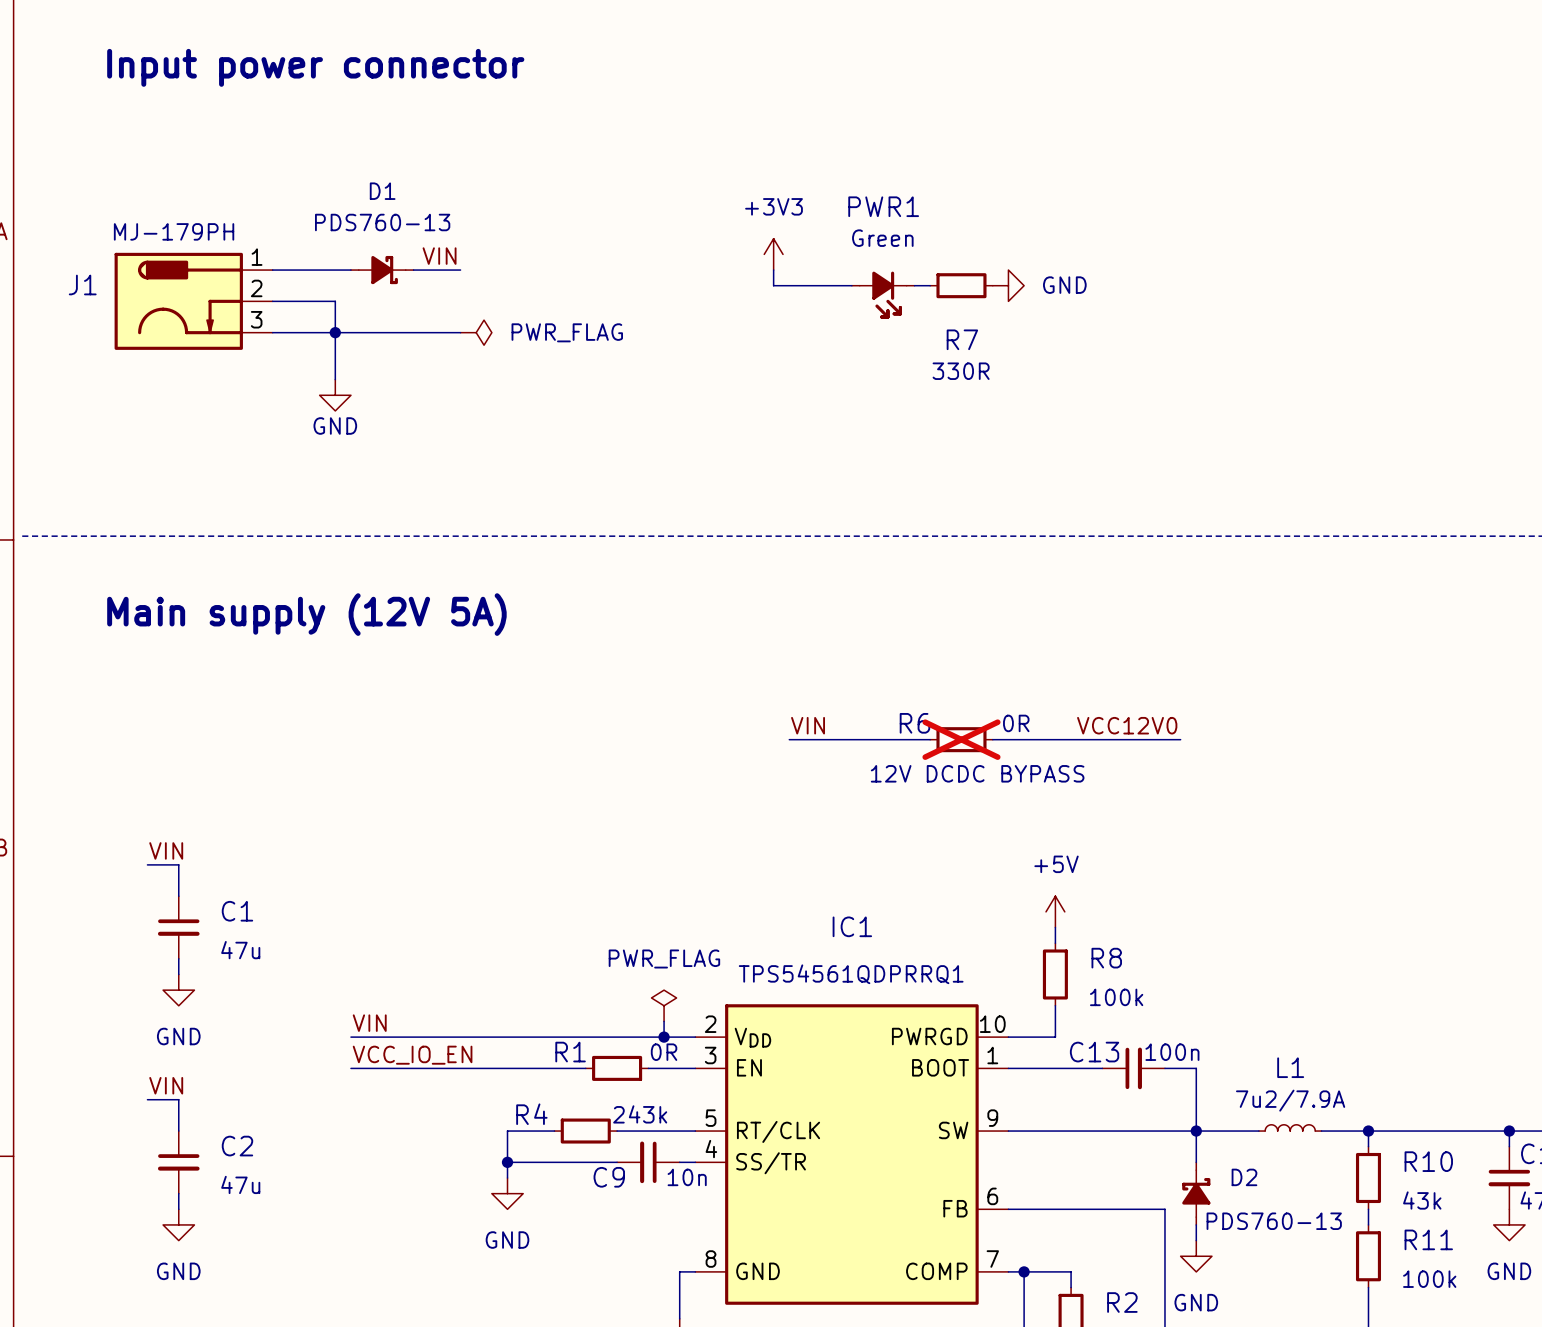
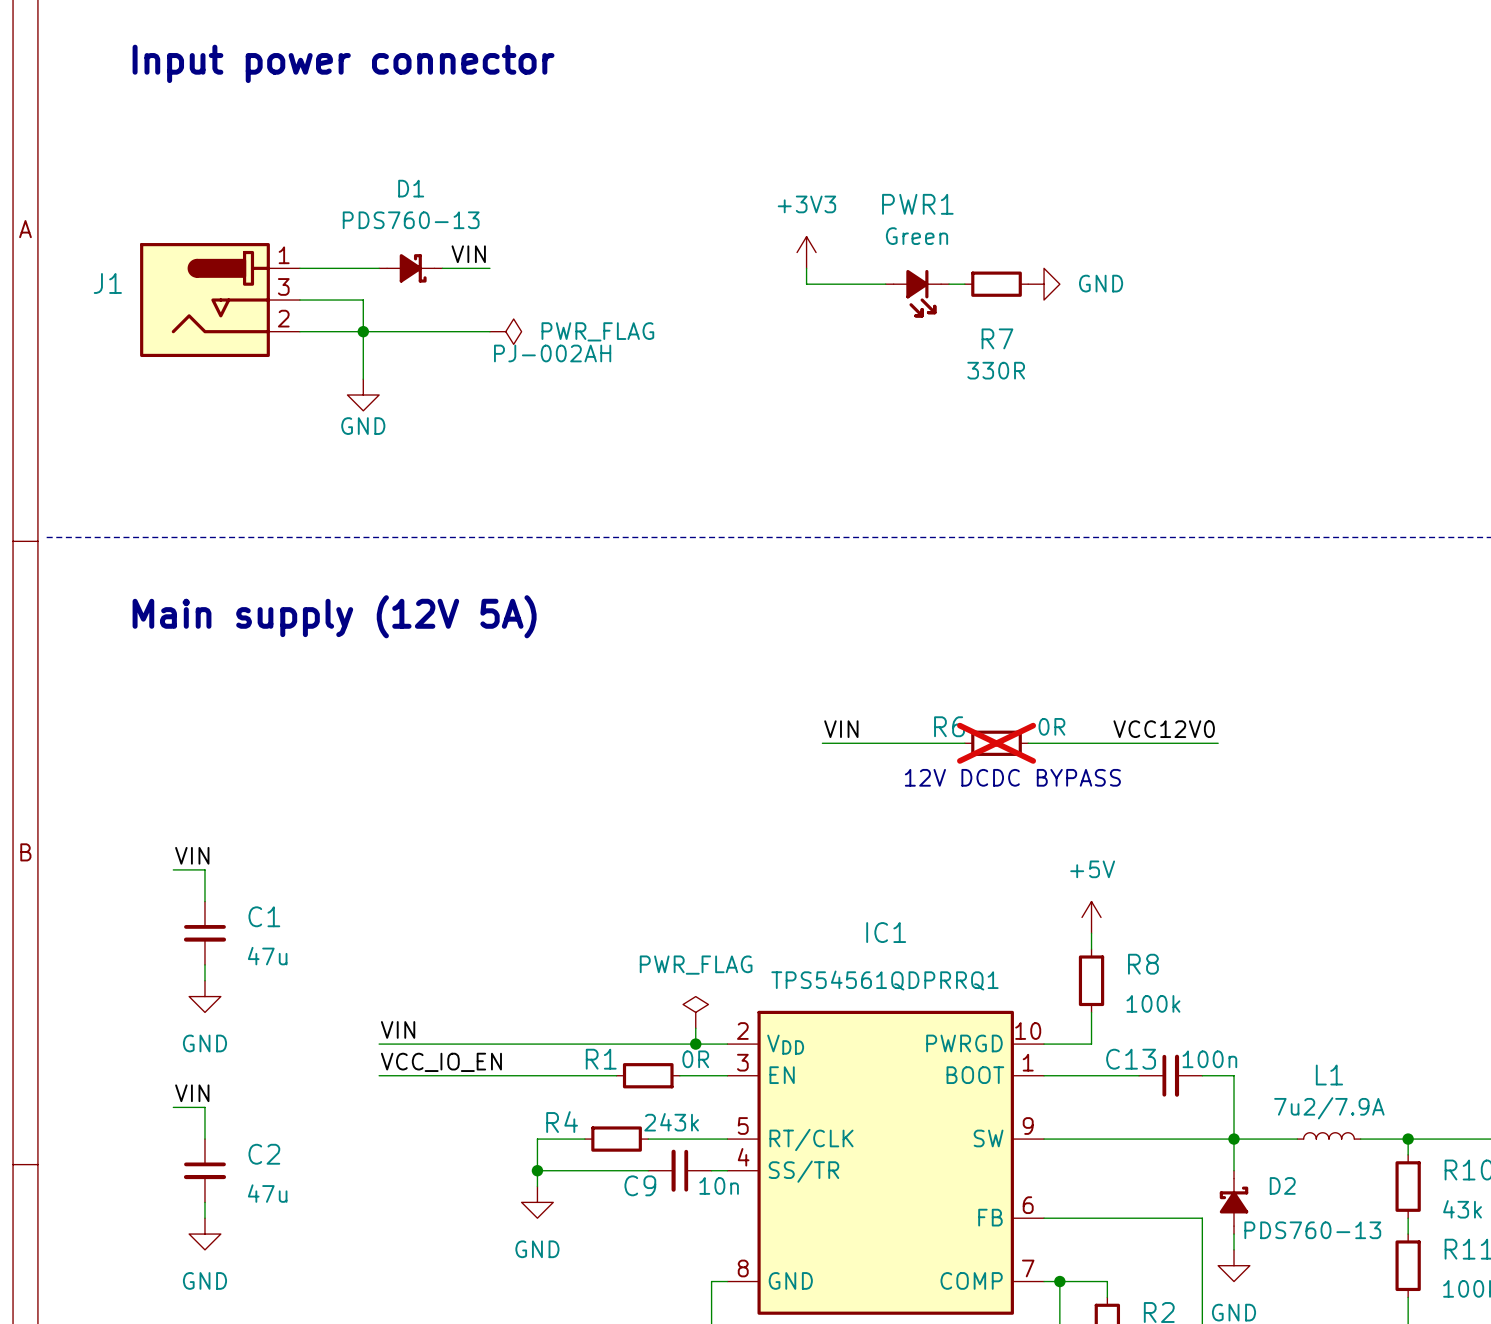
J1 text: MJ-179PH (174, 231) -> PJ-002AH (552, 353)
J1 symbol: [114, 252, 273, 350] -> [140, 243, 300, 358]

